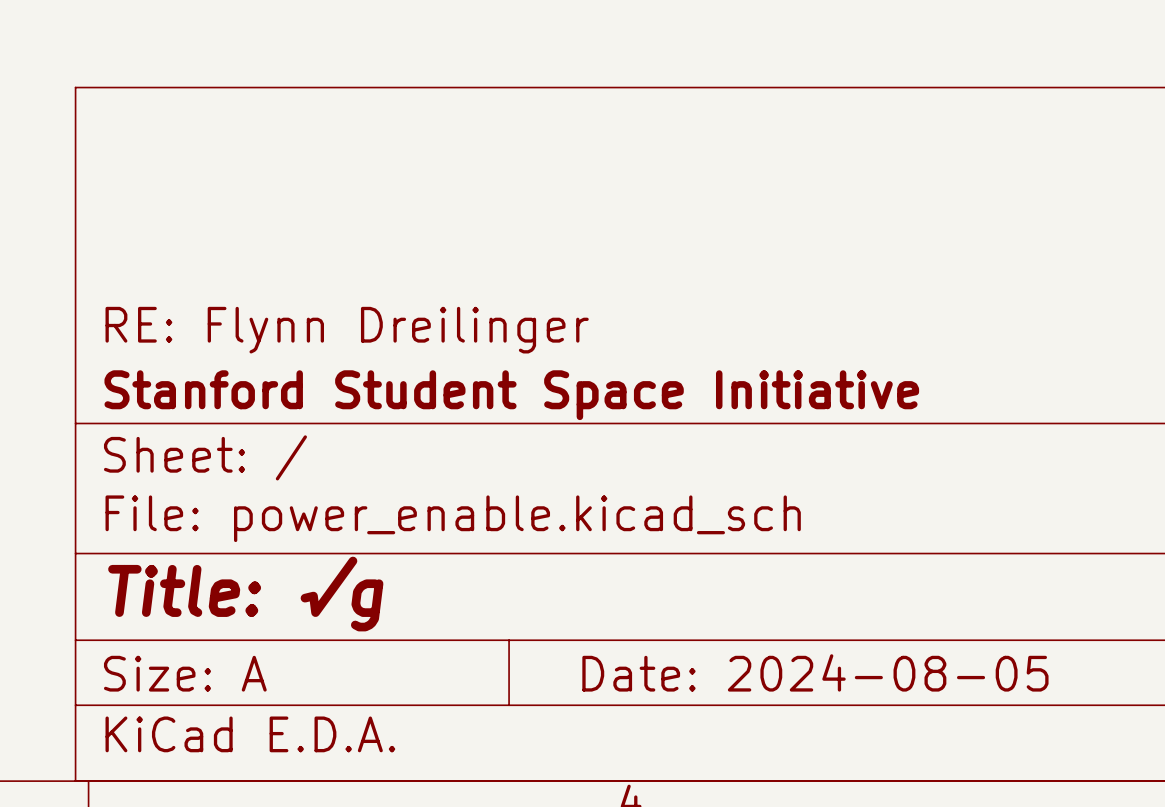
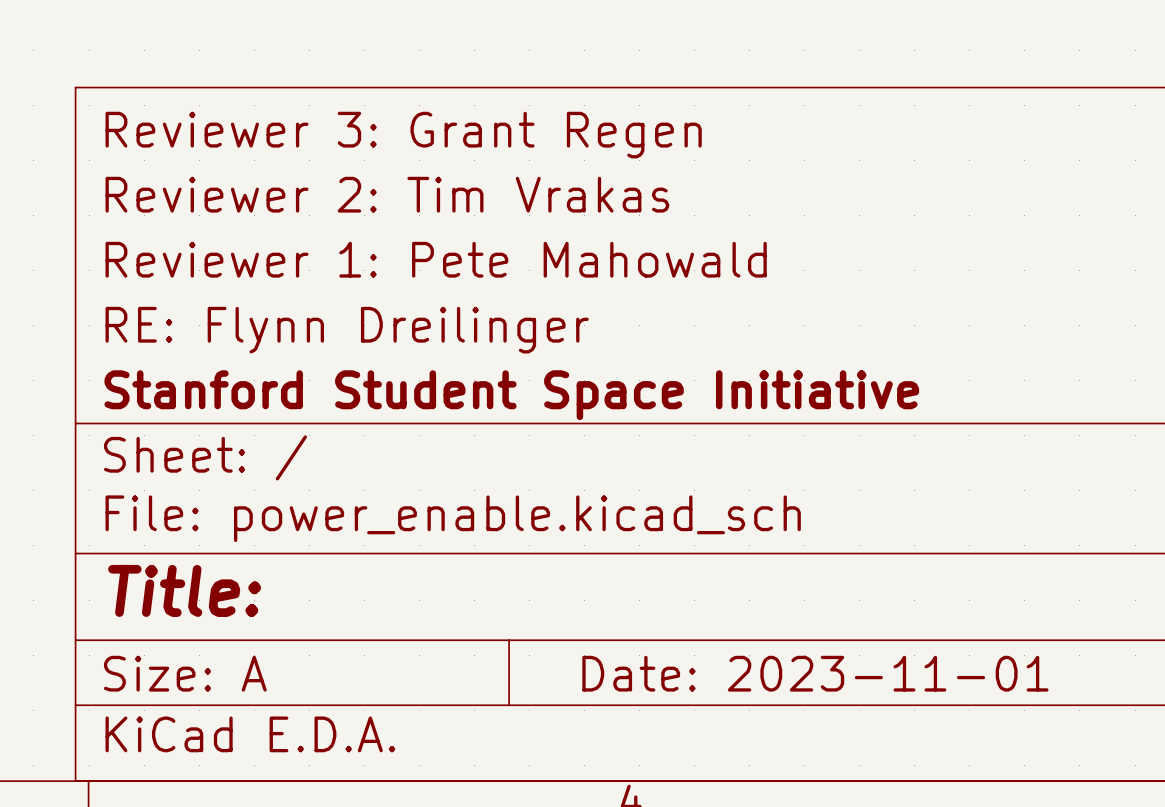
title block: none -> Reviewer 3: Grant Regen (403, 135)
title block: none -> Reviewer 2: Tim Vrakas (387, 194)
title block: none -> Reviewer 1: Pete Mahowald (436, 259)
title block: Title: √g (245, 594) -> Title: (184, 590)
title block: Date: 2024-08-05 (815, 672) -> Date: 2023-11-01 (815, 673)

